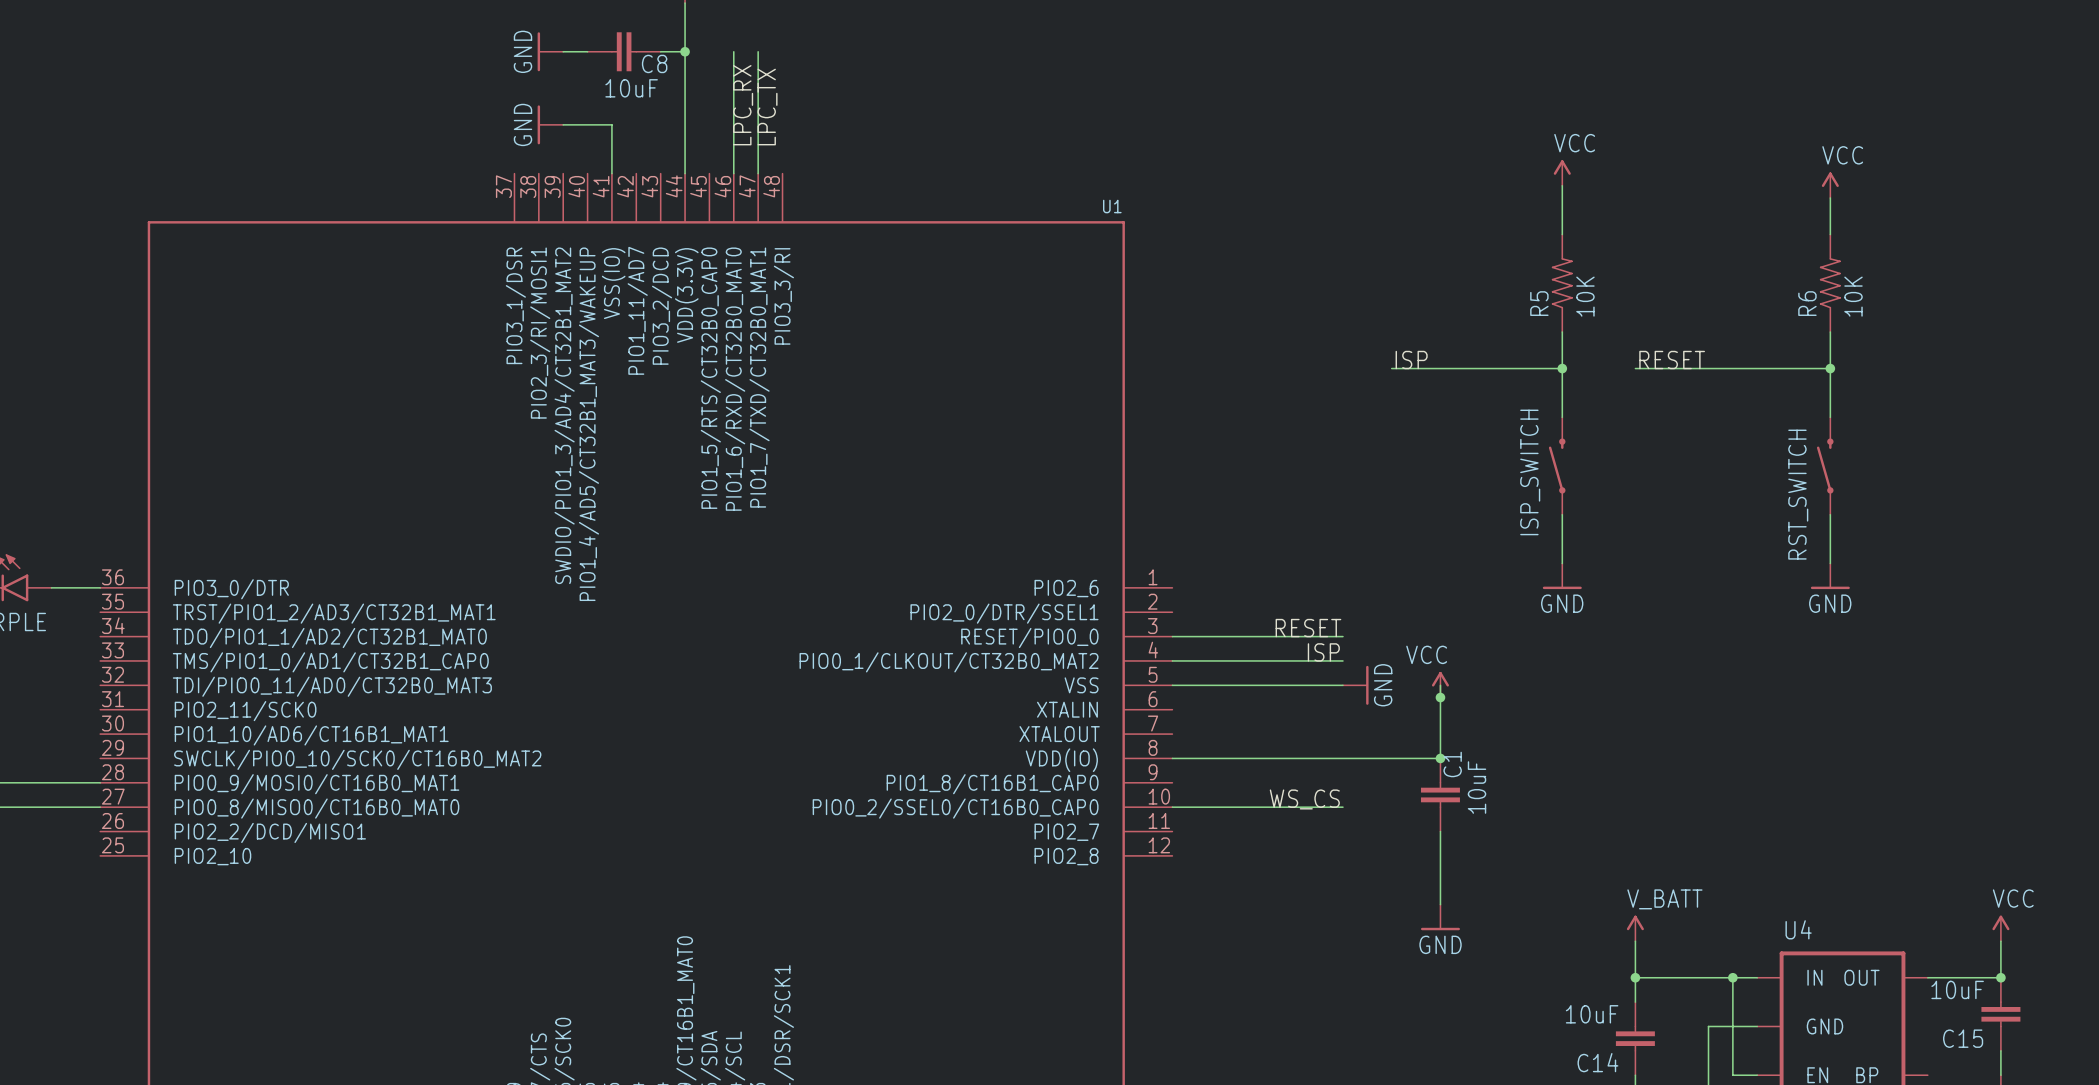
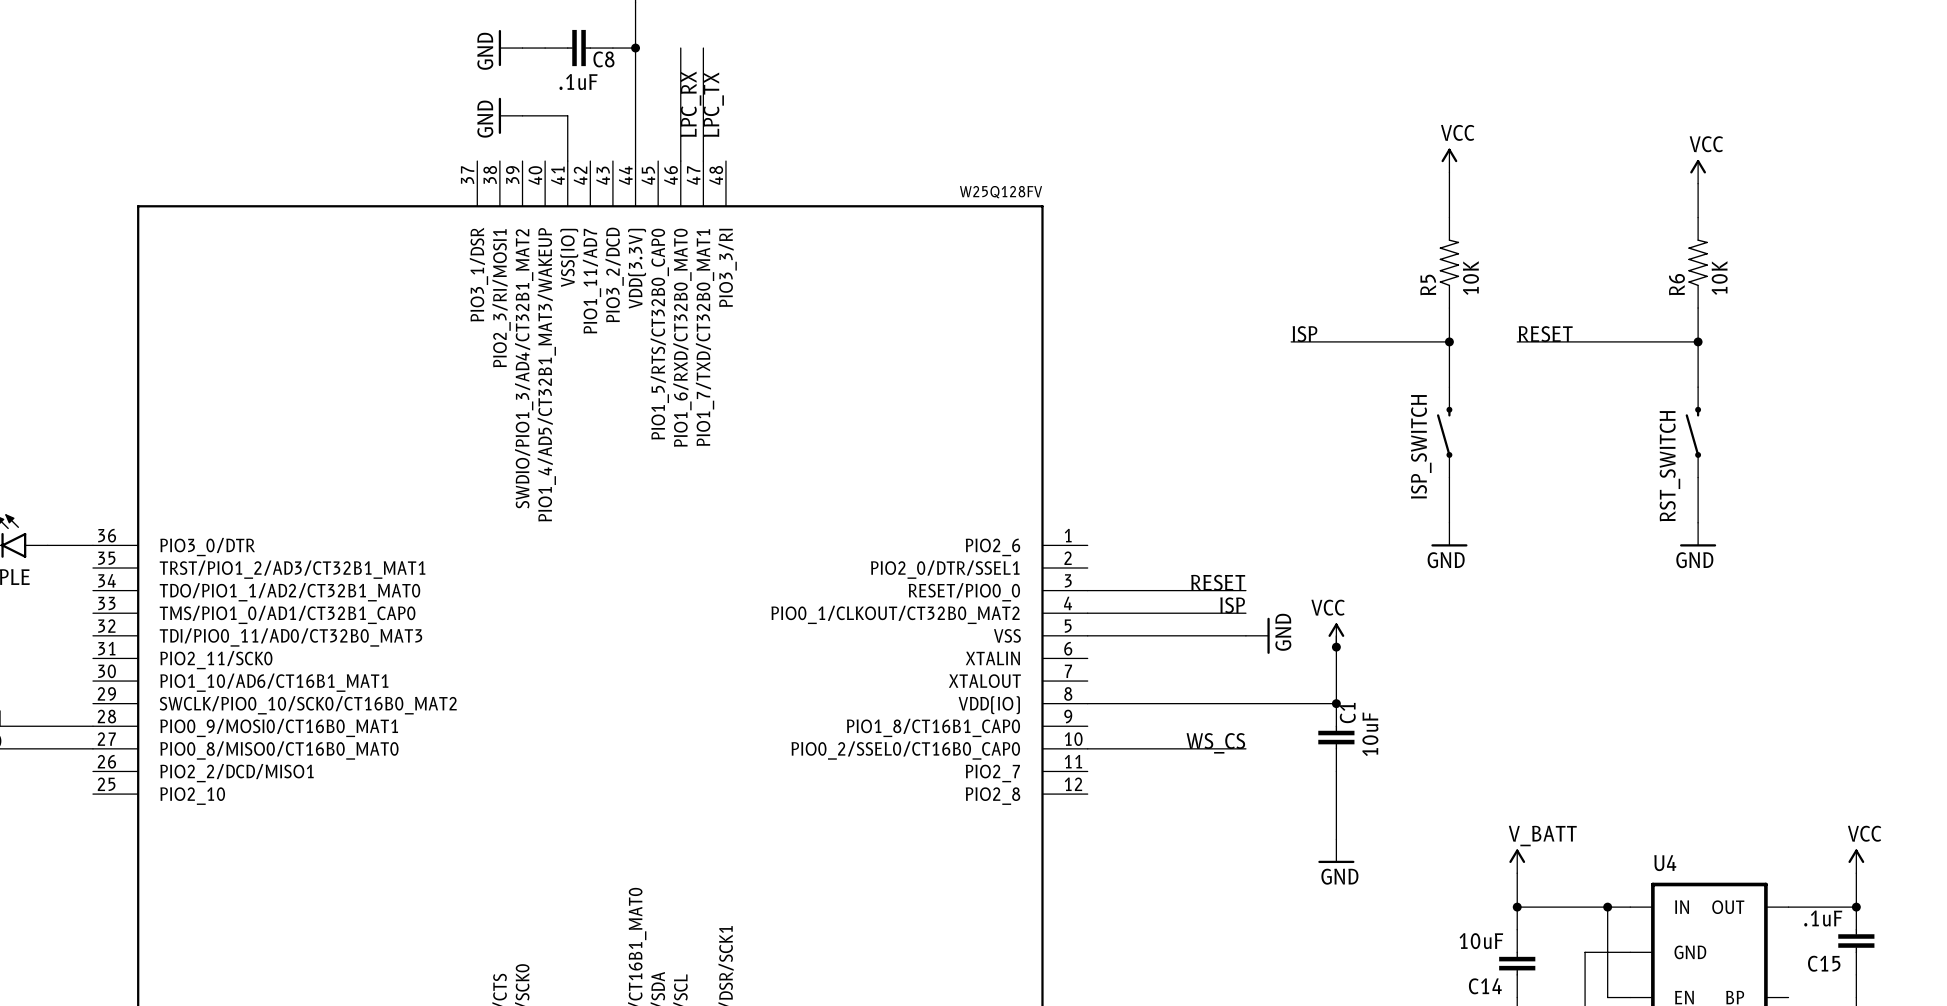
C8 value: 10uF (631, 88) -> .1uF (578, 82)
U1 name: U1 (1112, 206) -> W25Q128FV (1001, 192)
C15 value: 10uF (1957, 989) -> .1uF (1823, 918)

